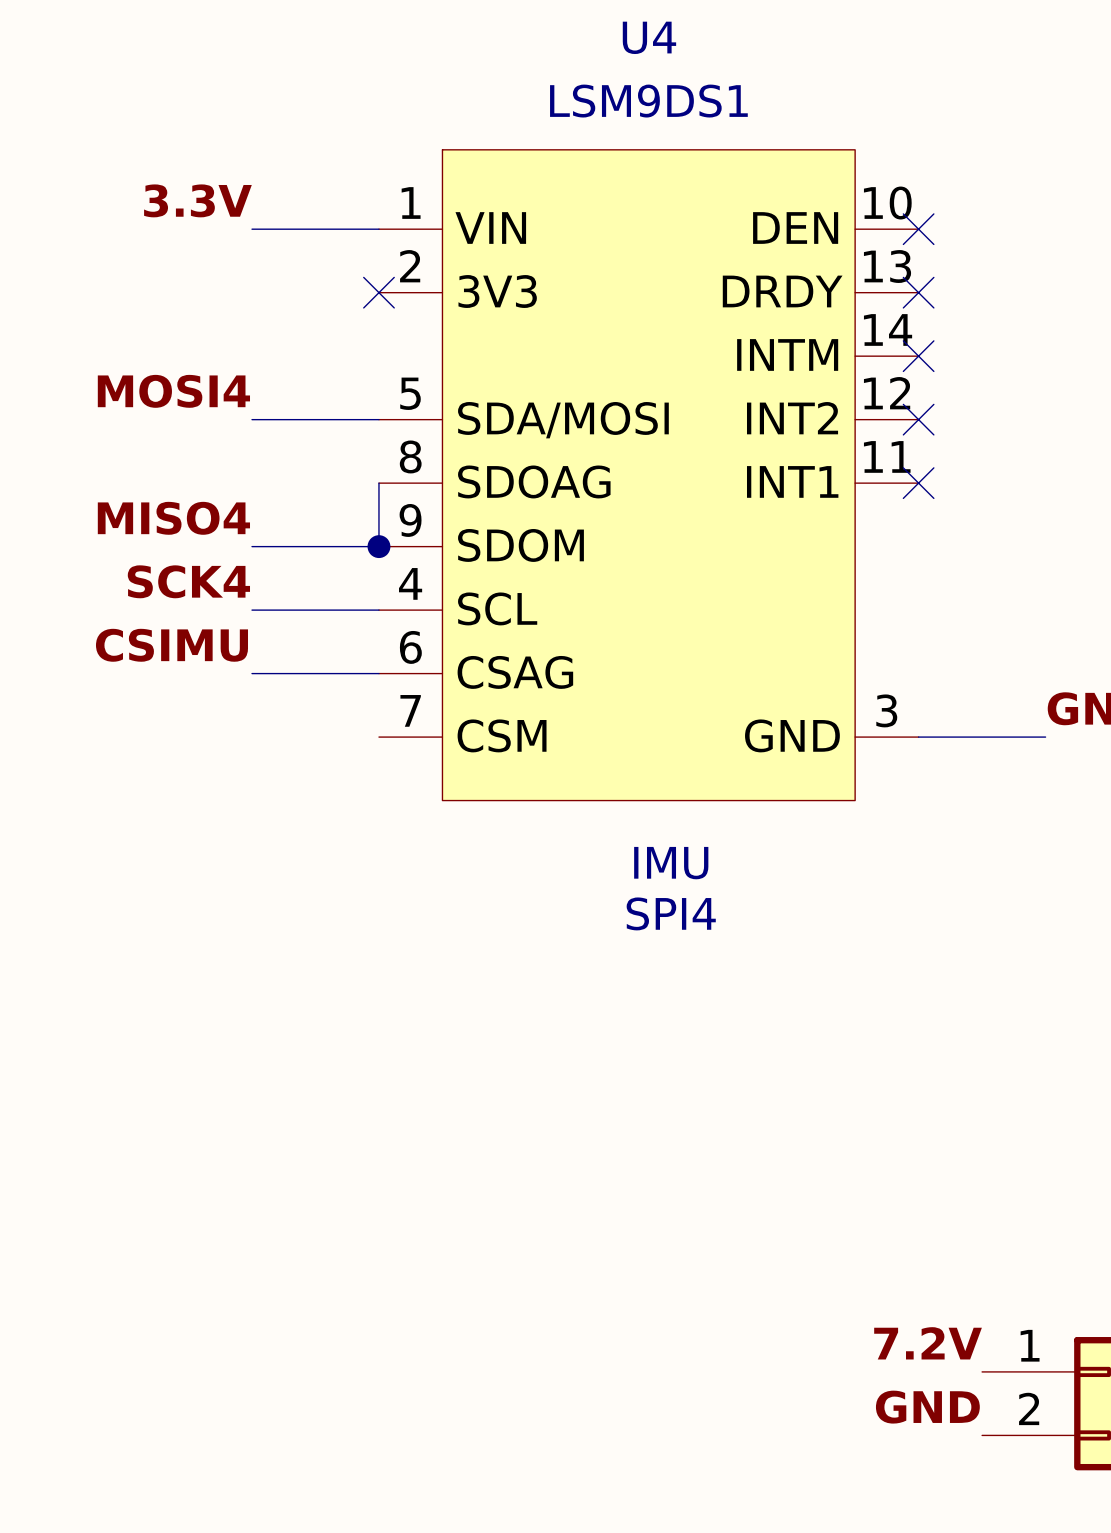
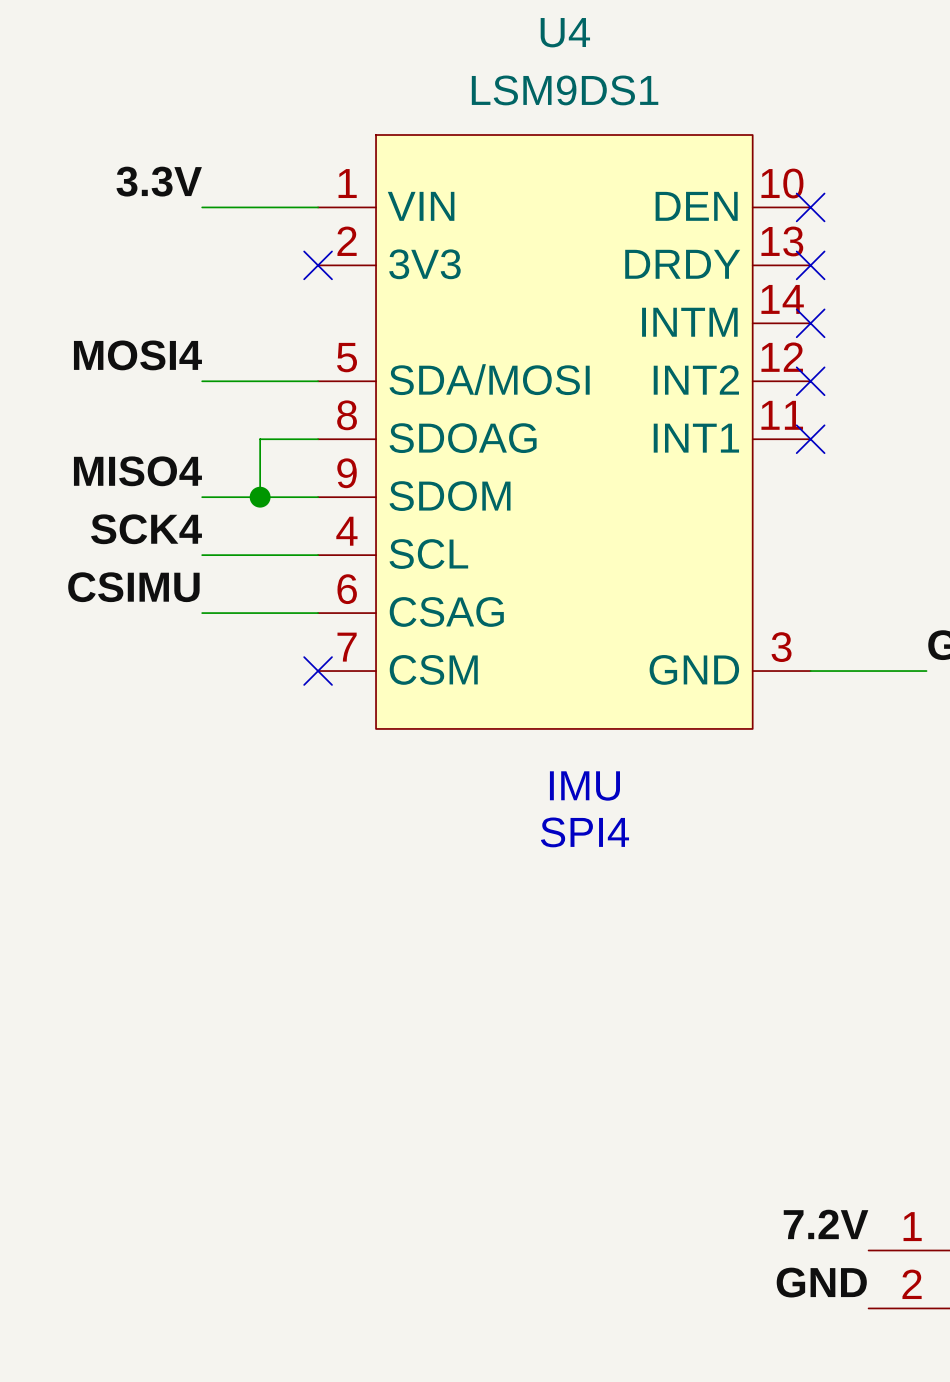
wire: (378, 483) (378, 546) -> (318, 439) (260, 439) (260, 497)
junction position: (378, 546) -> (260, 497)
no-connect mark: none -> (318, 671)

